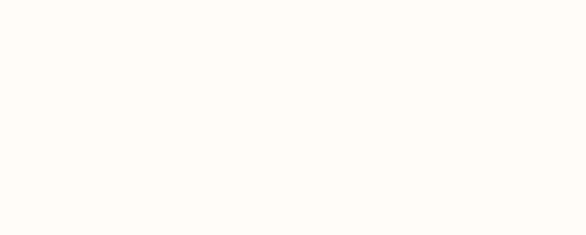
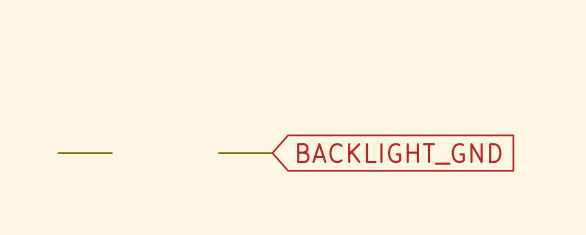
wire: none -> (58, 153) (111, 153)
wire: none -> (218, 153) (272, 153)
global label: none -> BACKLIGHT_GND (399, 153)

